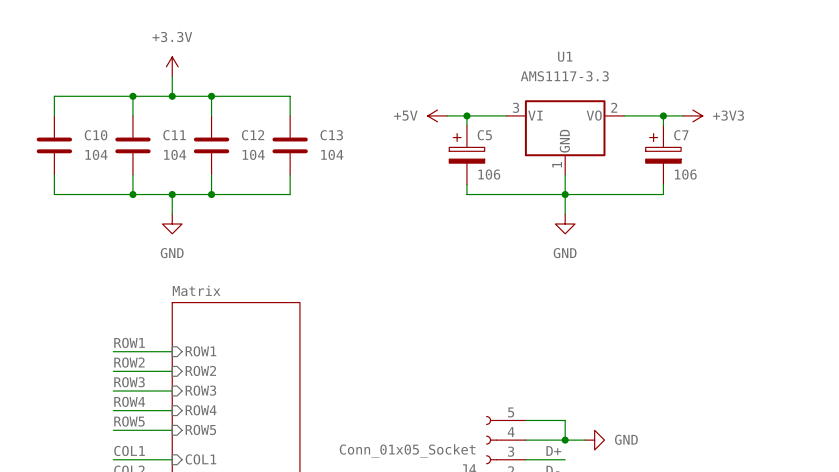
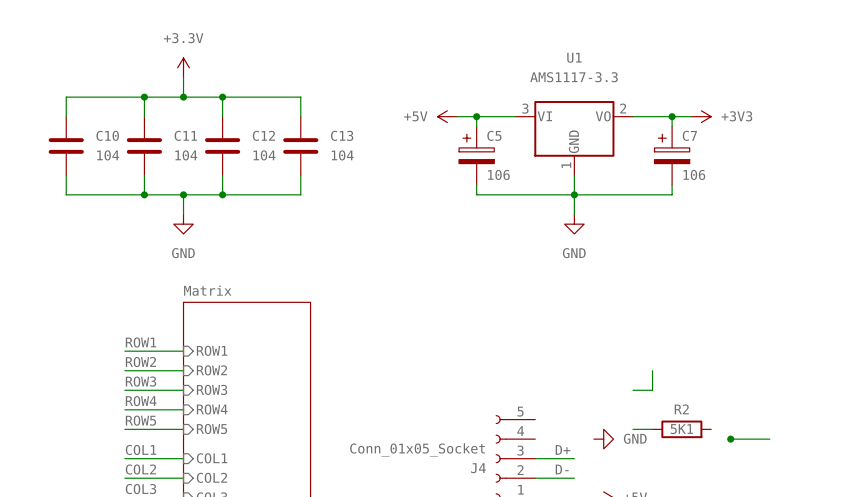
wire: none -> (652, 370) (652, 390) (633, 390)
wire: (525, 420) (565, 420) (565, 440) -> none
wire: none -> (633, 429) (652, 429)
R2: none -> 5K1 (681, 429)
wire: (525, 440) (584, 440) -> none
junction: (565, 440) -> none
wire: none -> (730, 439) (769, 439)
junction: none -> (730, 439)

